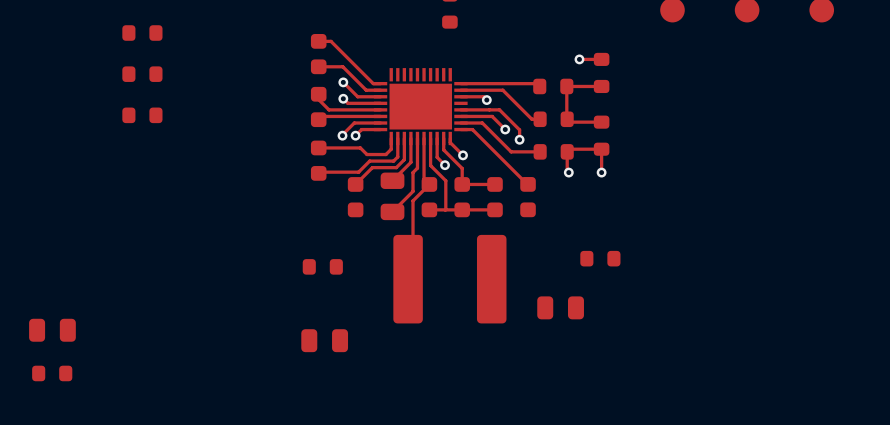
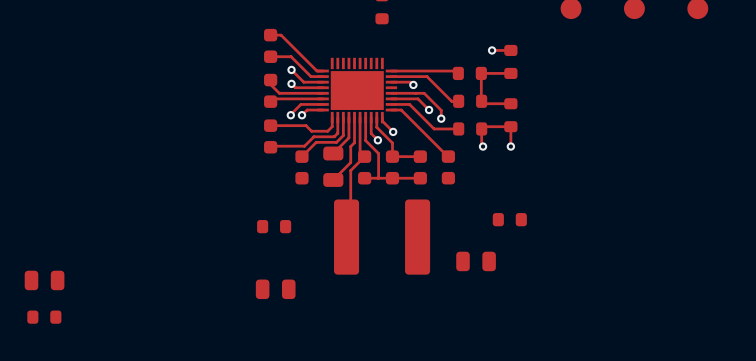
part: (142, 33) -> none
part: (142, 74) -> none
part: (142, 115) -> none

